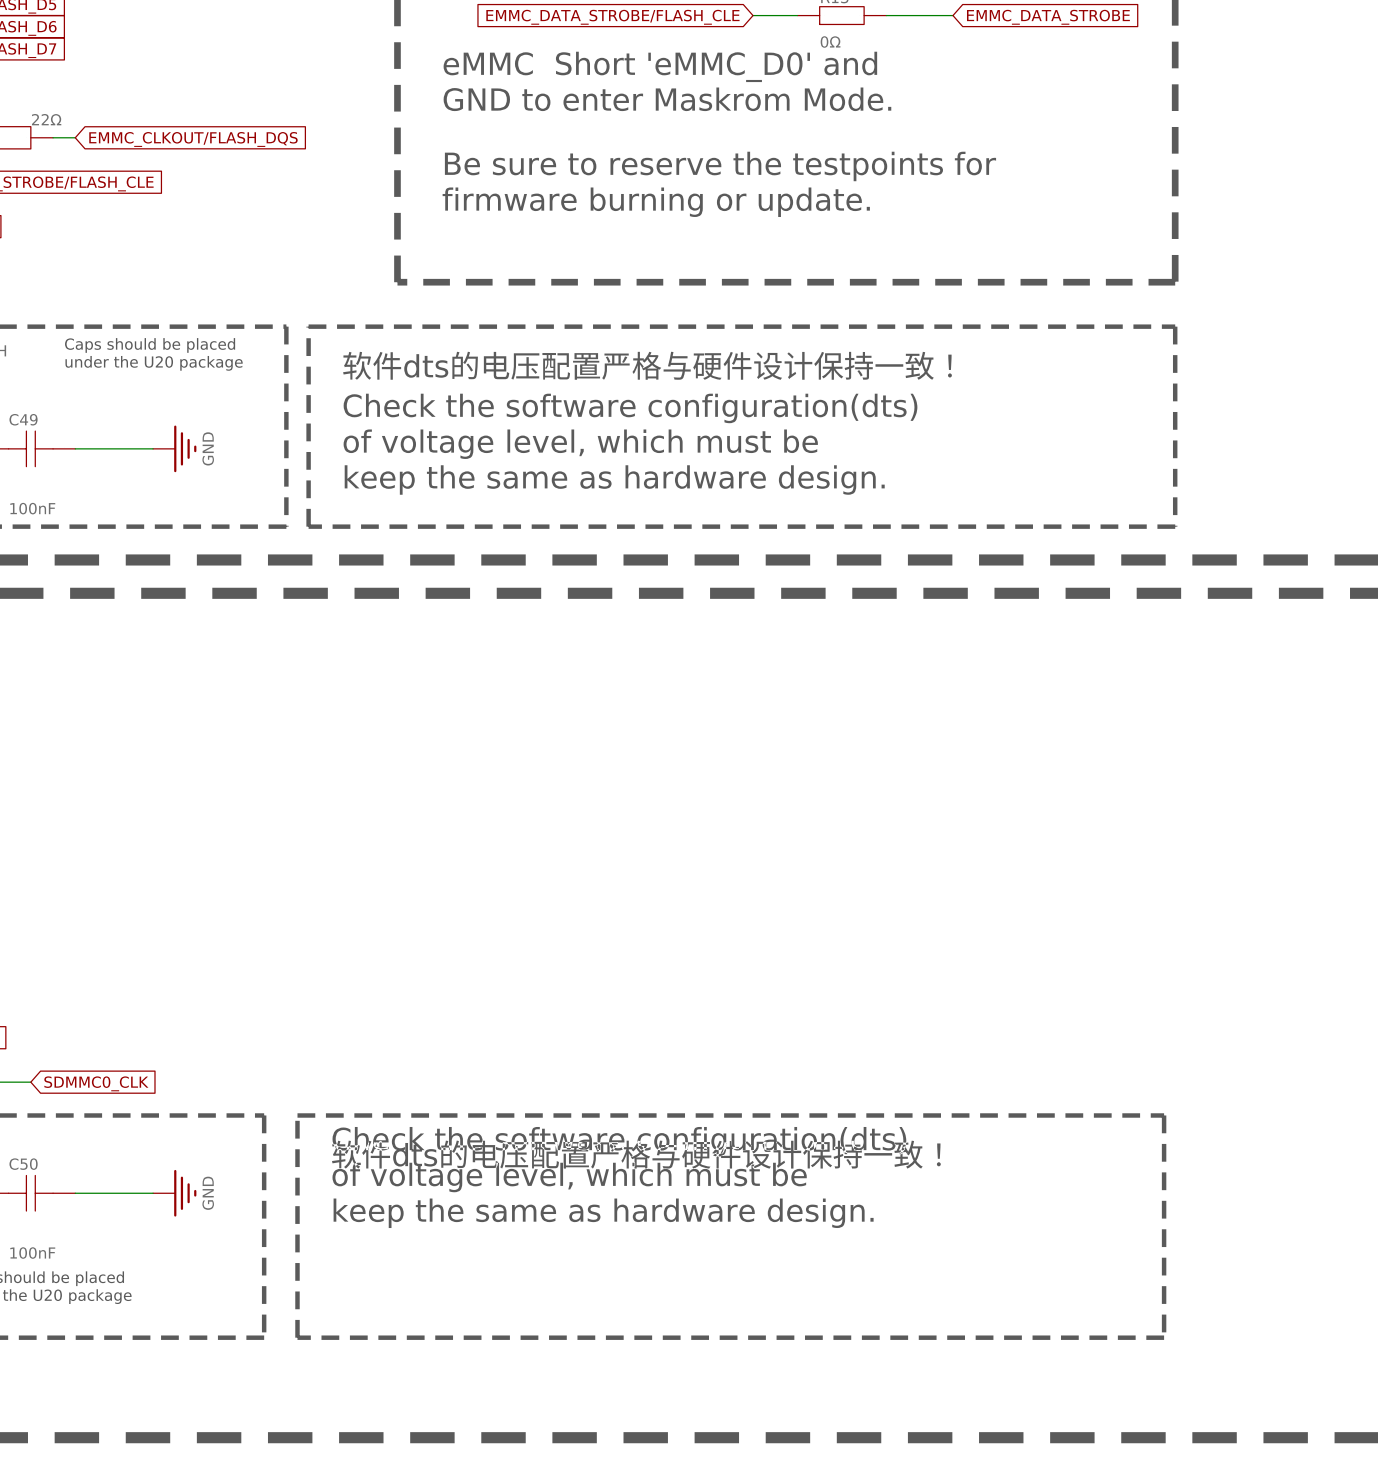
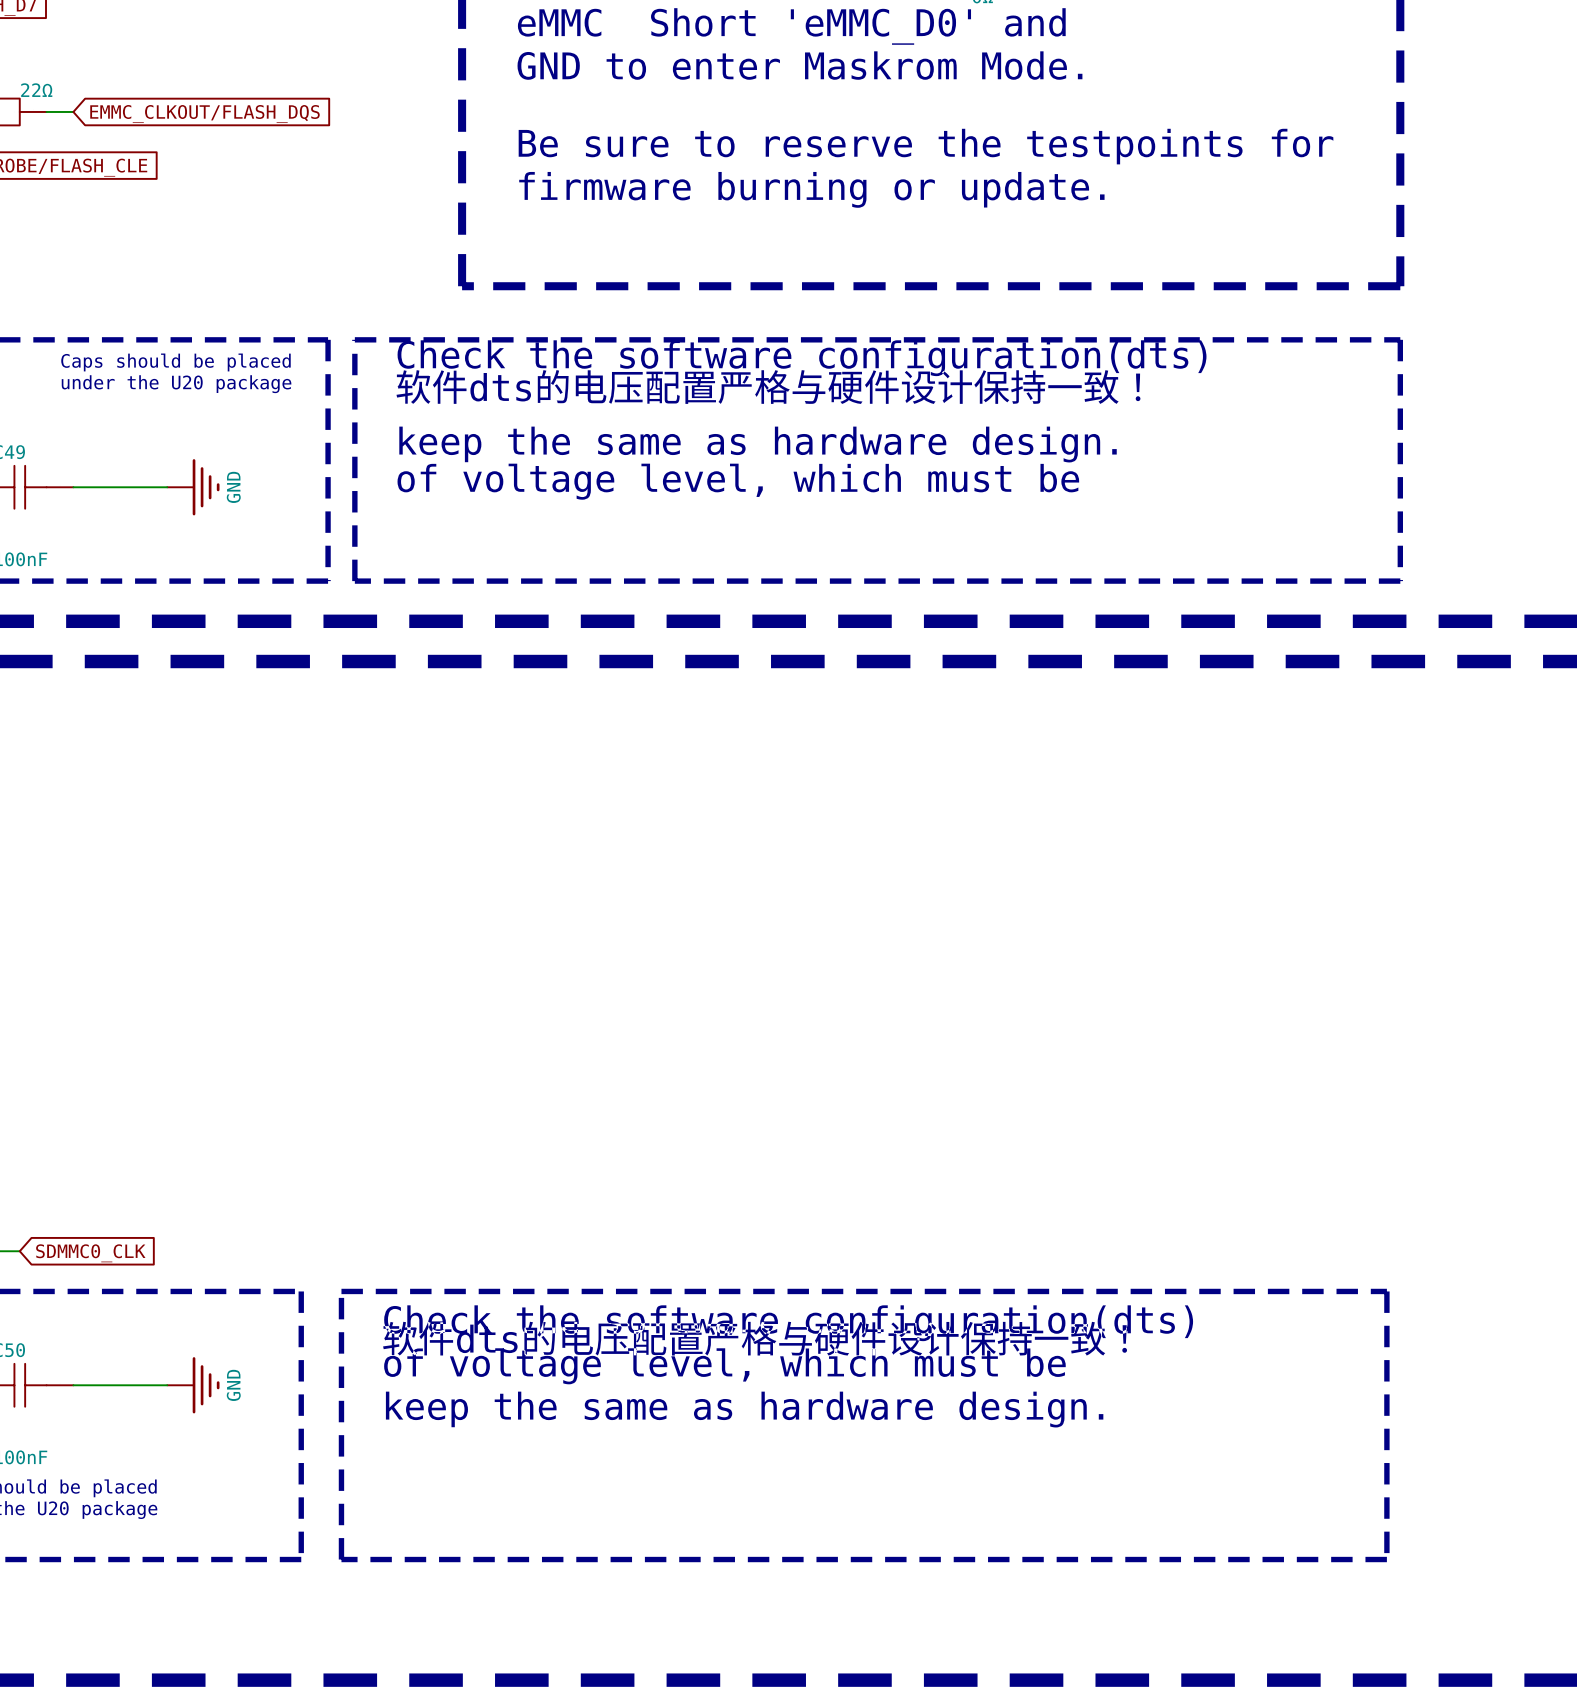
text position: Check the software configuration(dts) (630, 408) -> Check the software configuration(dts) (802, 358)
text position: keep the same as hardware design. (614, 480) -> keep the same as hardware design. (758, 444)

